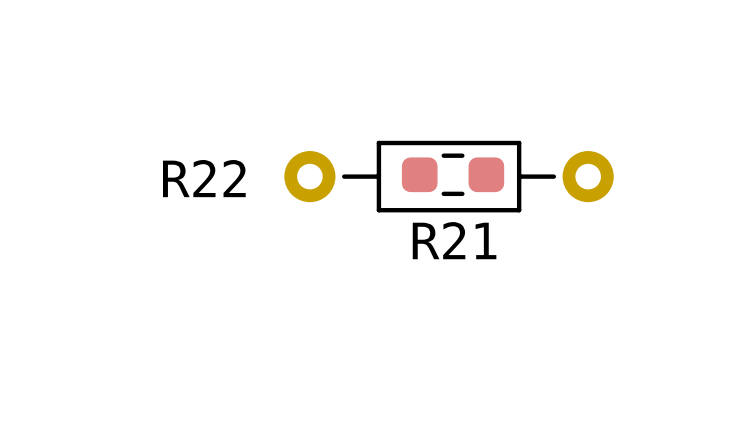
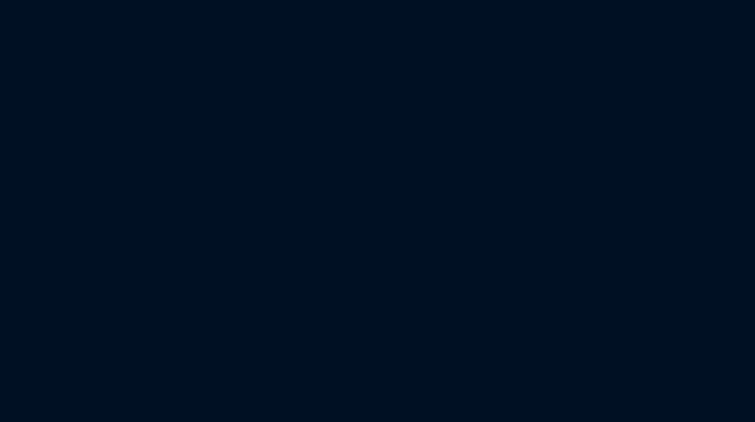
R21: (453, 174) -> none
R22: (449, 176) -> none

